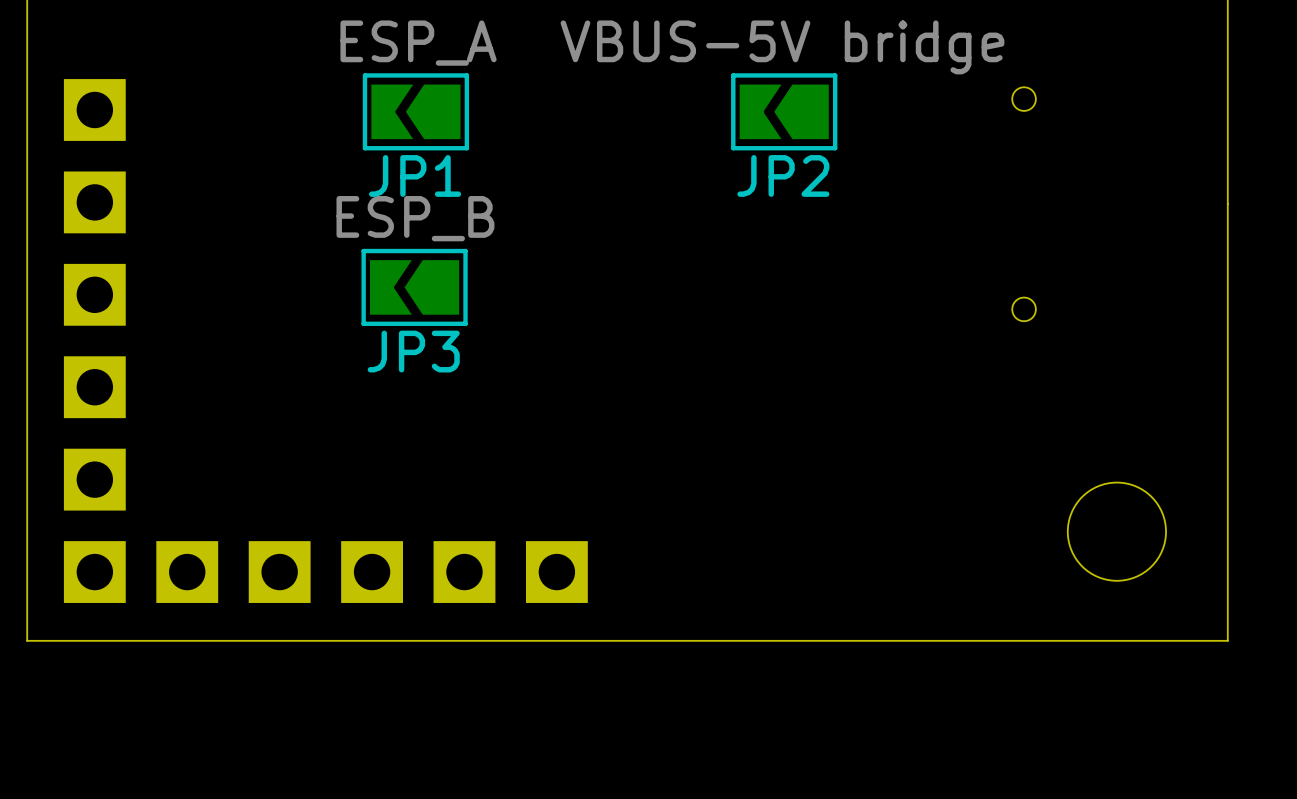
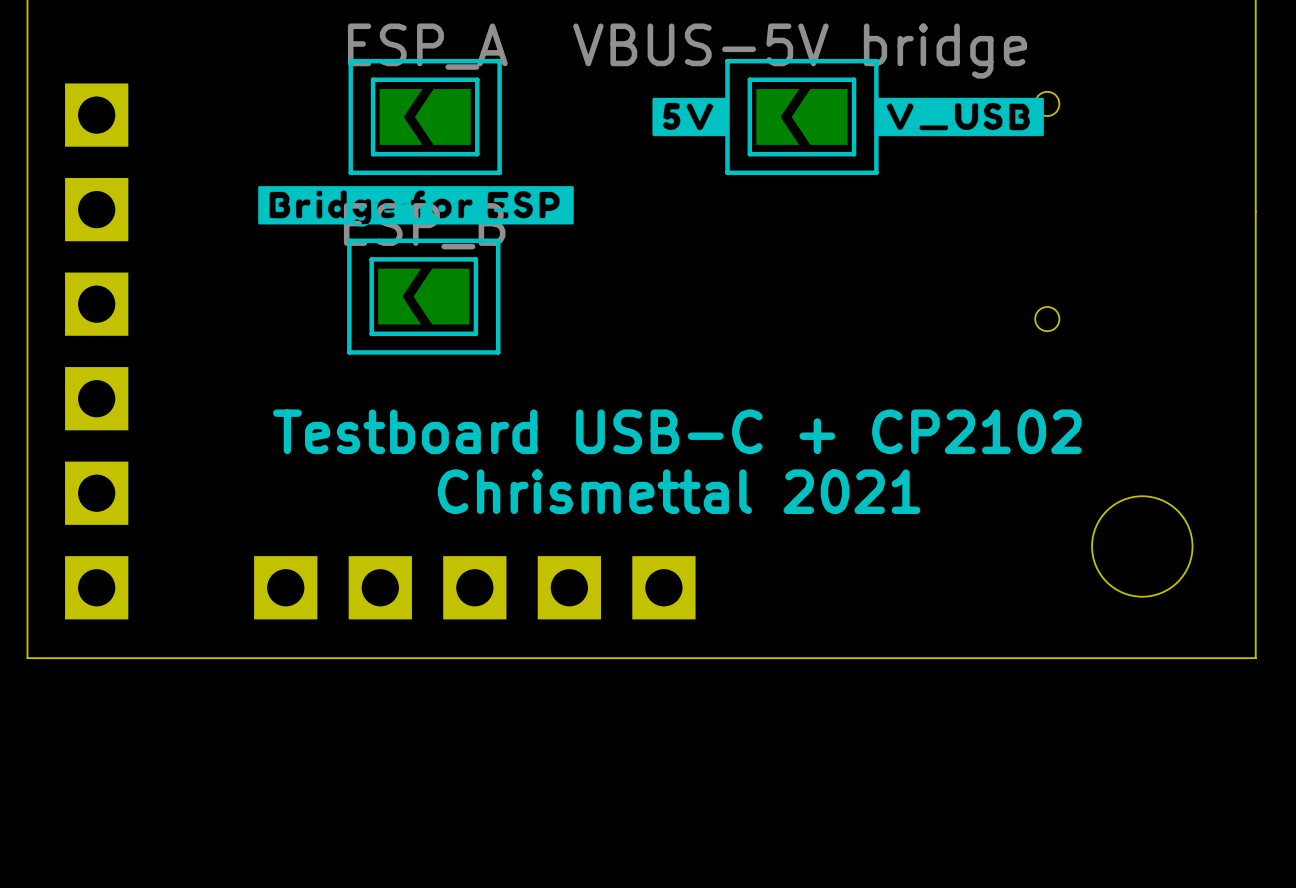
line: none -> (499, 61) (350, 61) (350, 172) (499, 172) (499, 61)
line: none -> (876, 61) (727, 61) (727, 172) (876, 172) (876, 61)
drawing: none -> [652, 97, 729, 137]
drawing: none -> [876, 97, 1044, 137]
JP1 name: JP1 (415, 175) -> none
JP2 name: JP2 (783, 175) -> none
drawing: none -> [258, 186, 574, 227]
line: none -> (498, 240) (349, 240) (349, 352) (498, 352) (498, 240)
JP3 name: JP3 (413, 351) -> none
text: none -> Testboard USB-C + CP2102 (677, 431)
text: none -> Chrismettal 2021 (679, 491)
part position: (187, 572) -> (663, 587)

